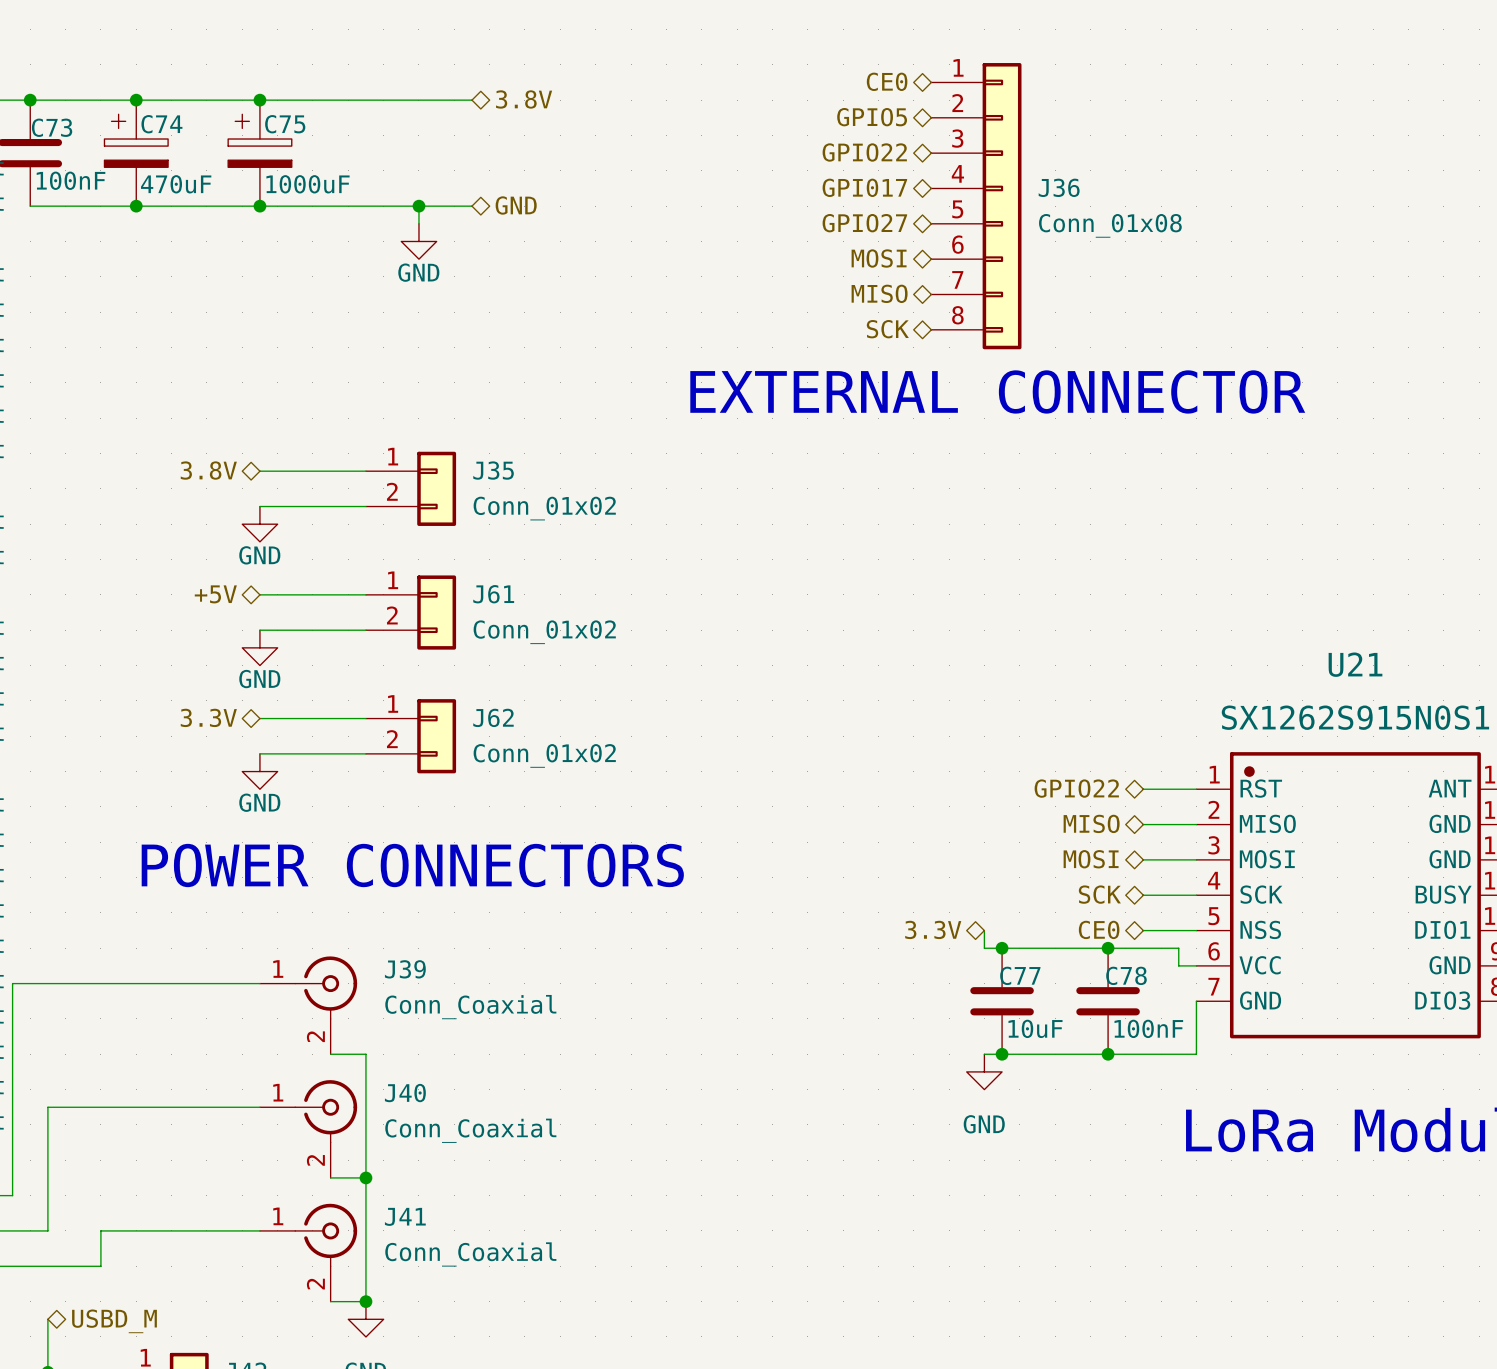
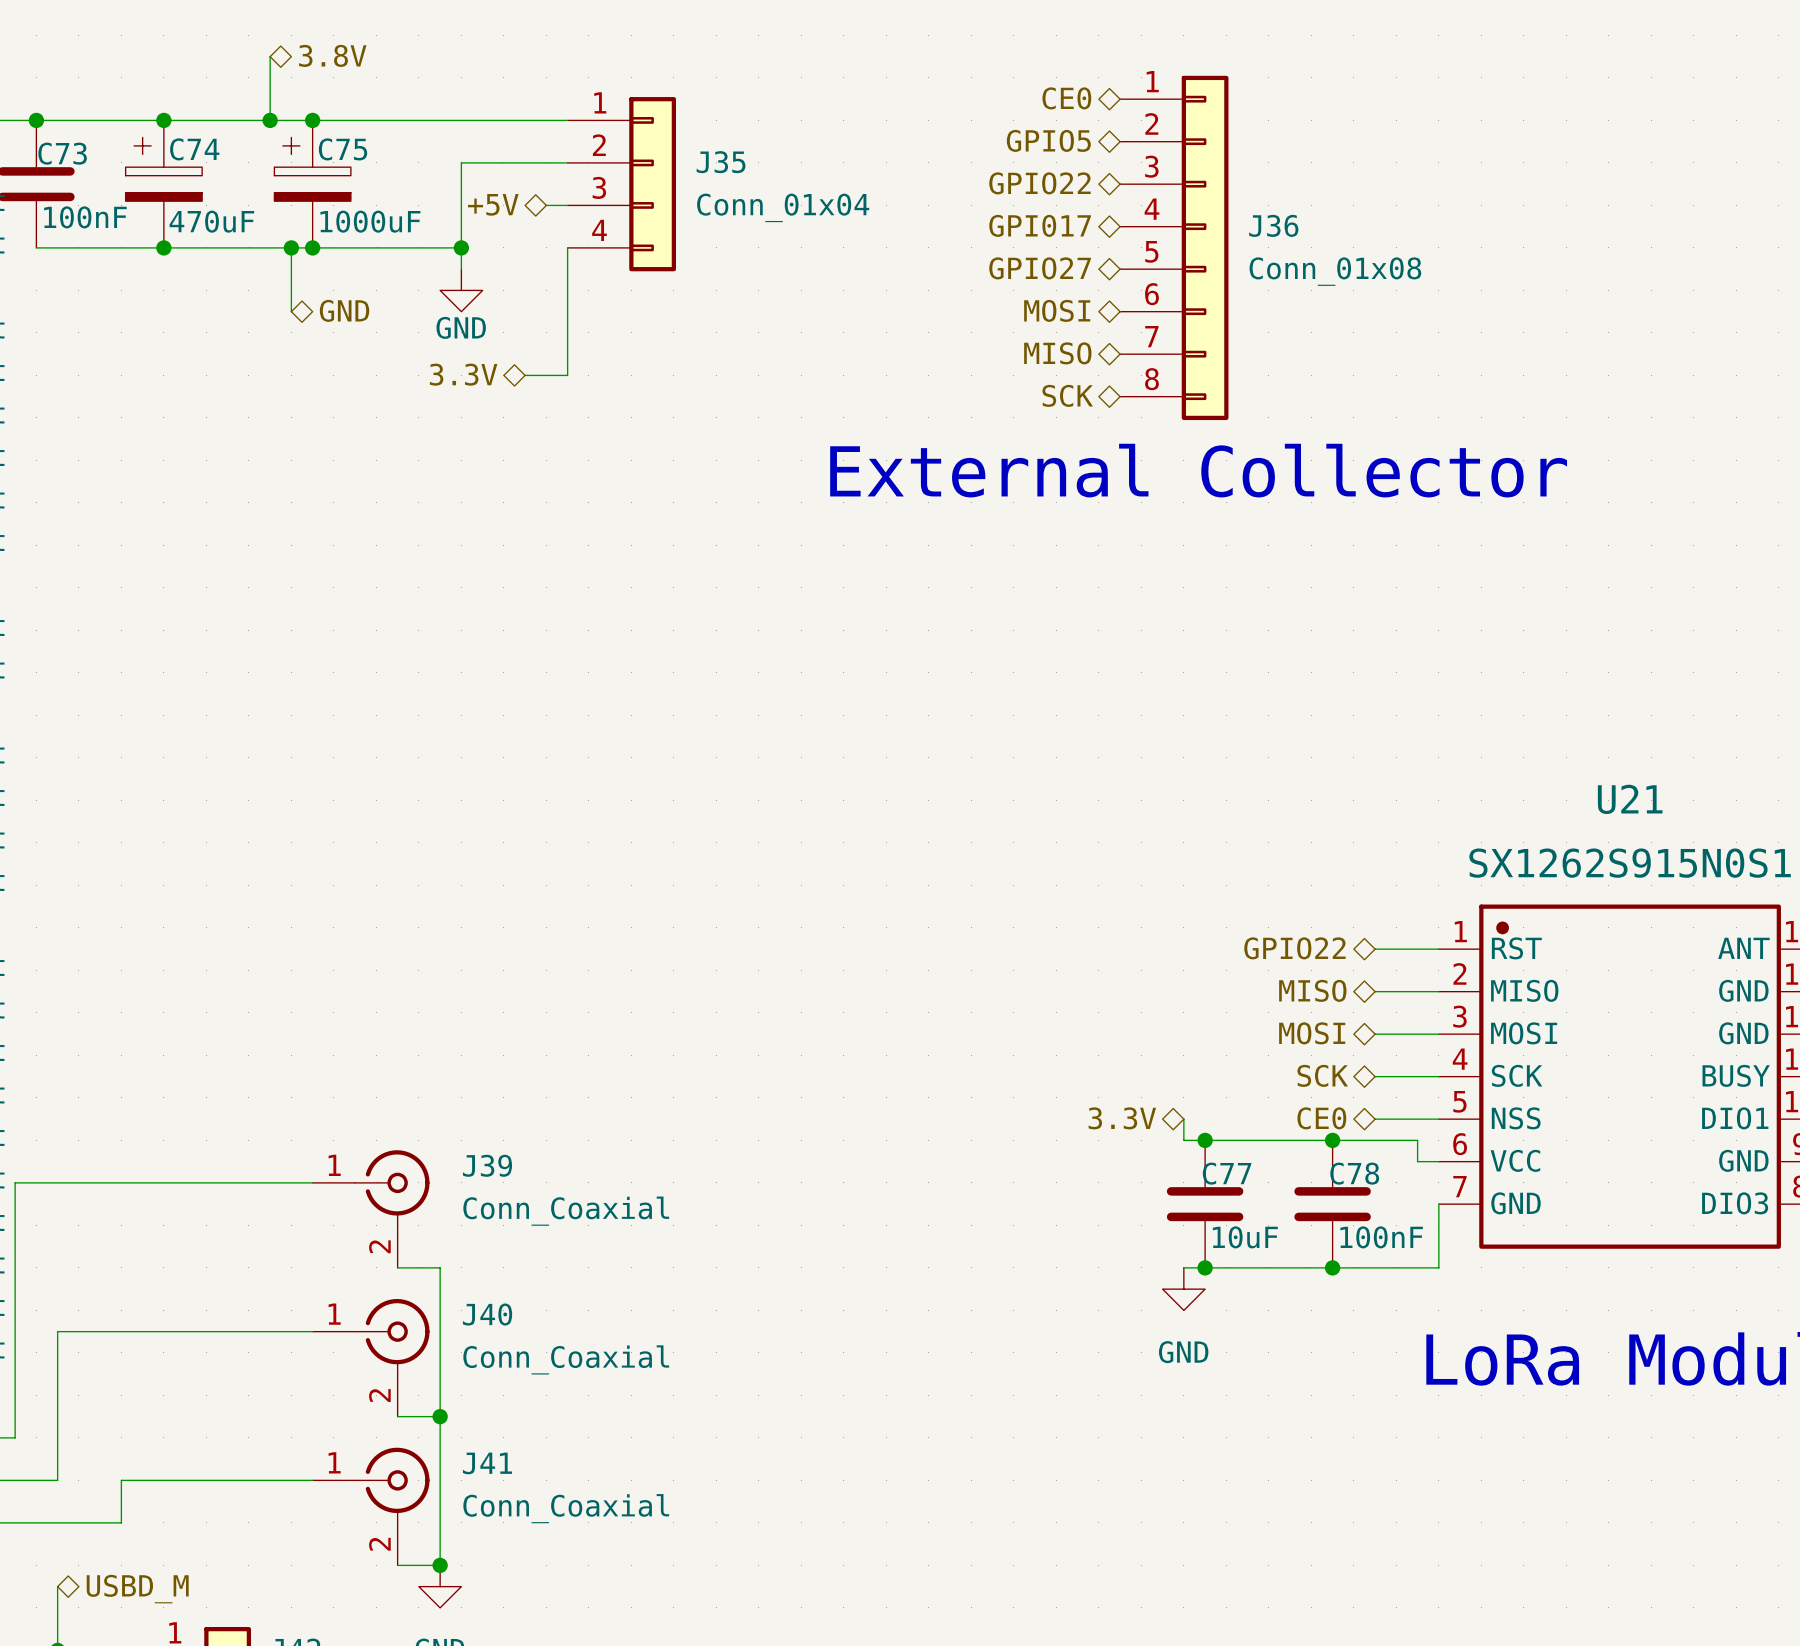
hierarchical label: none -> 3.8V (332, 55)
wire: none -> (270, 56) (270, 120)
hierarchical label: 3.8V (524, 99) -> none
junction: none -> (270, 120)
wire: none -> (567, 162) (461, 162) (461, 269)
hierarchical label: none -> +5V (493, 204)
wire: none -> (546, 205) (567, 205)
hierarchical label position: GND (516, 205) -> GND (344, 310)
wire: none -> (291, 247) (291, 311)
junction: none -> (291, 247)
wire: (383, 206) (471, 206) -> (525, 375) (567, 375) (567, 247)
wire: (418, 206) (418, 223) -> none
junction position: (418, 206) -> (461, 247)
power symbol position: GND (418, 241) -> GND (461, 290)
hierarchical label: none -> 3.3V (463, 374)
text: EXTERNAL CONNECTOR (997, 391) -> External Collector (1198, 470)
J35 symbol: [365, 451, 457, 526] -> [567, 97, 676, 272]
hierarchical label: 3.8V (208, 470) -> none
wire: (259, 471) (365, 471) -> none
wire: (259, 506) (365, 506) -> none
J35 value: Conn_01x02 (544, 508) -> Conn_01x04 (783, 207)
power symbol: GND (259, 524) -> none
hierarchical label: +5V (215, 594) -> none
wire: (259, 594) (365, 594) -> none
J61: Conn_01x02 (411, 612) -> none
wire: (259, 630) (365, 630) -> none
power symbol: GND (259, 647) -> none
hierarchical label: 3.3V (208, 717) -> none
wire: (259, 718) (365, 718) -> none
J62: Conn_01x02 (411, 736) -> none
wire: (259, 753) (365, 753) -> none
power symbol: GND (259, 771) -> none
text: POWER CONNECTORS (412, 865) -> none

